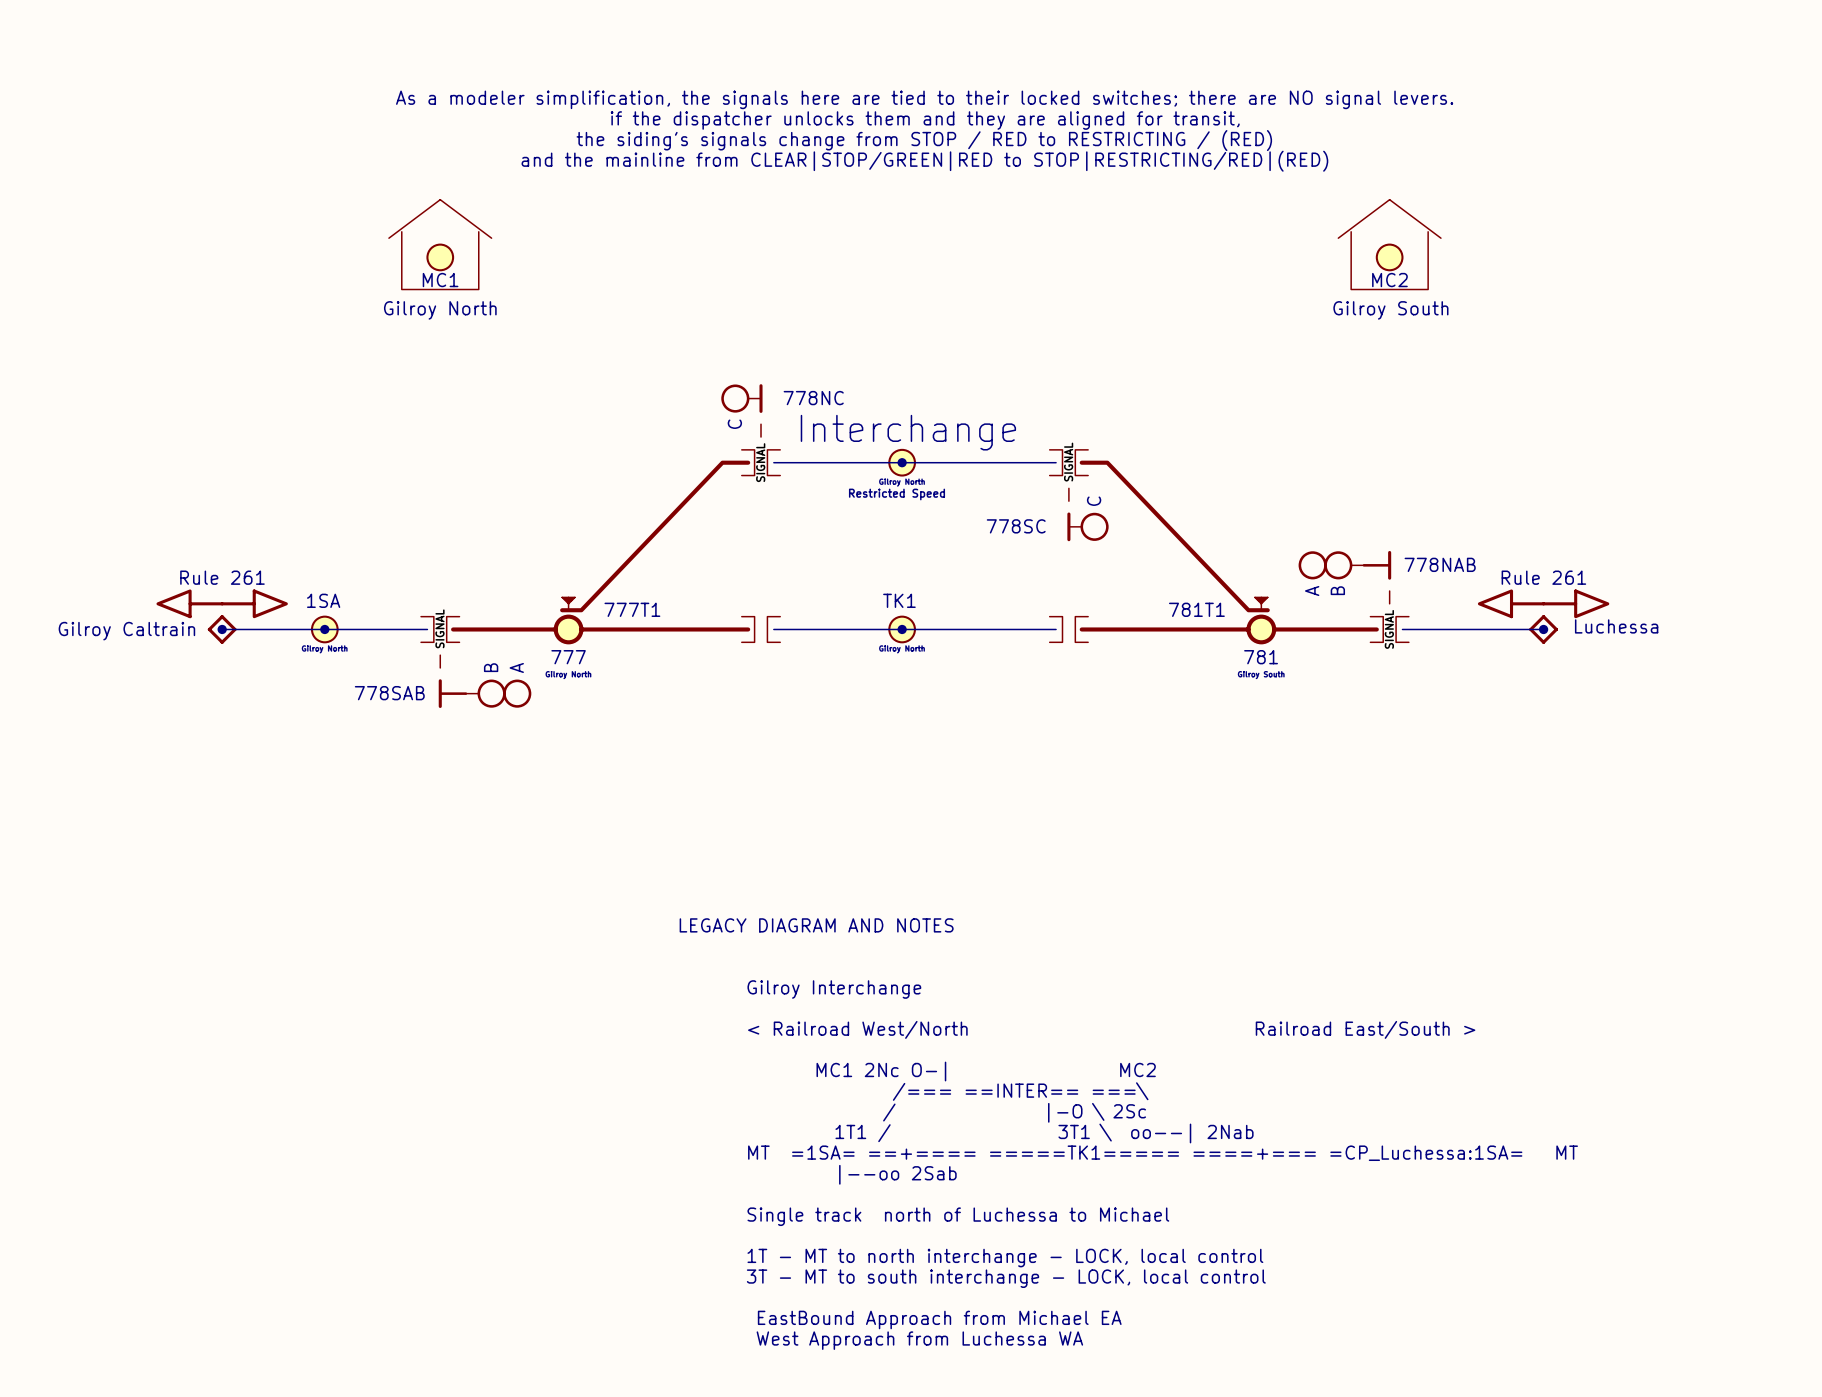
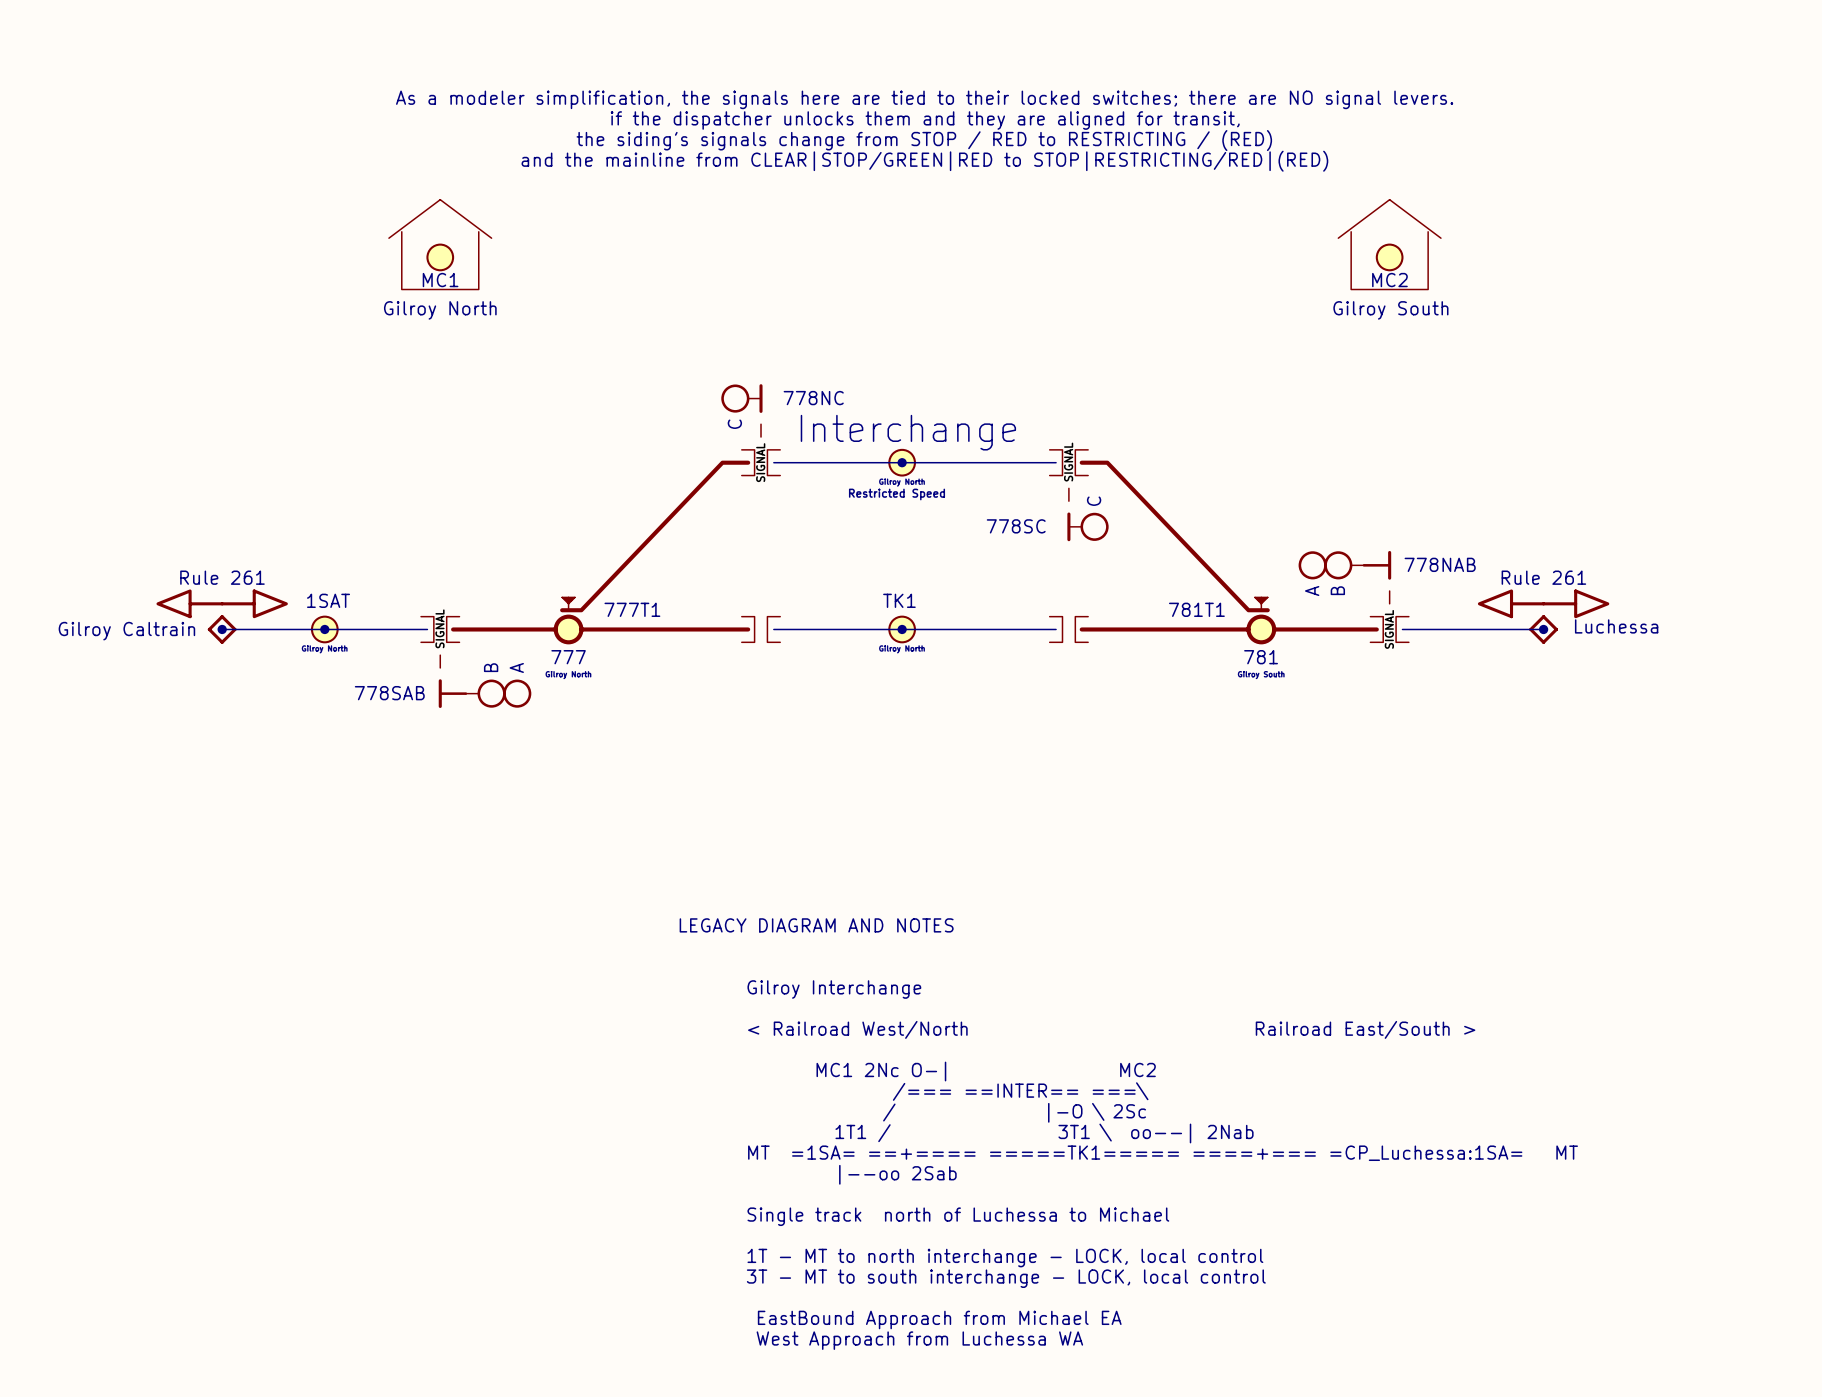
part value: 1SA (323, 600) -> 1SAT (328, 600)

